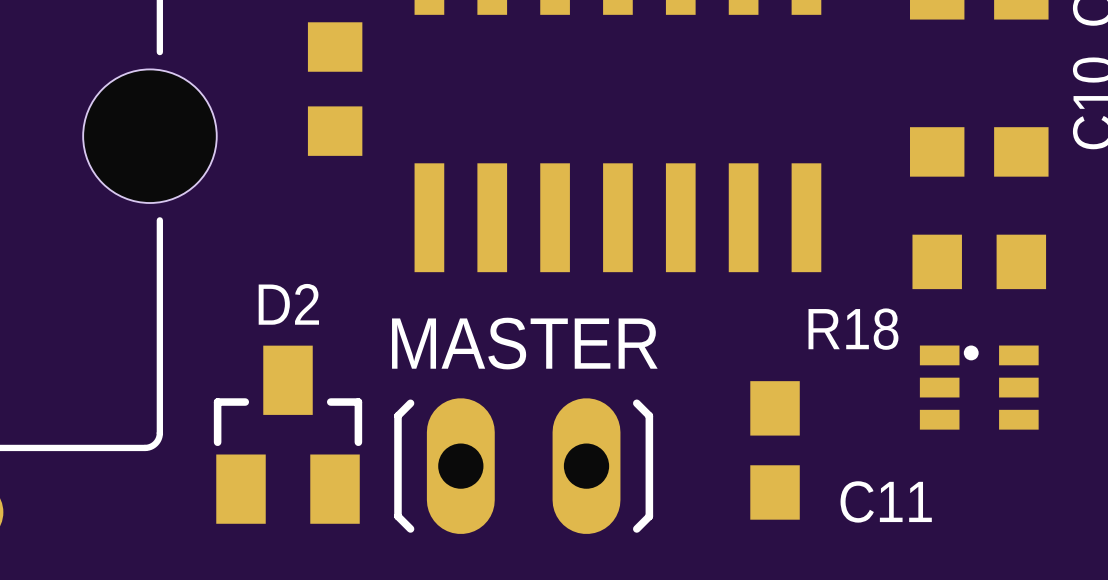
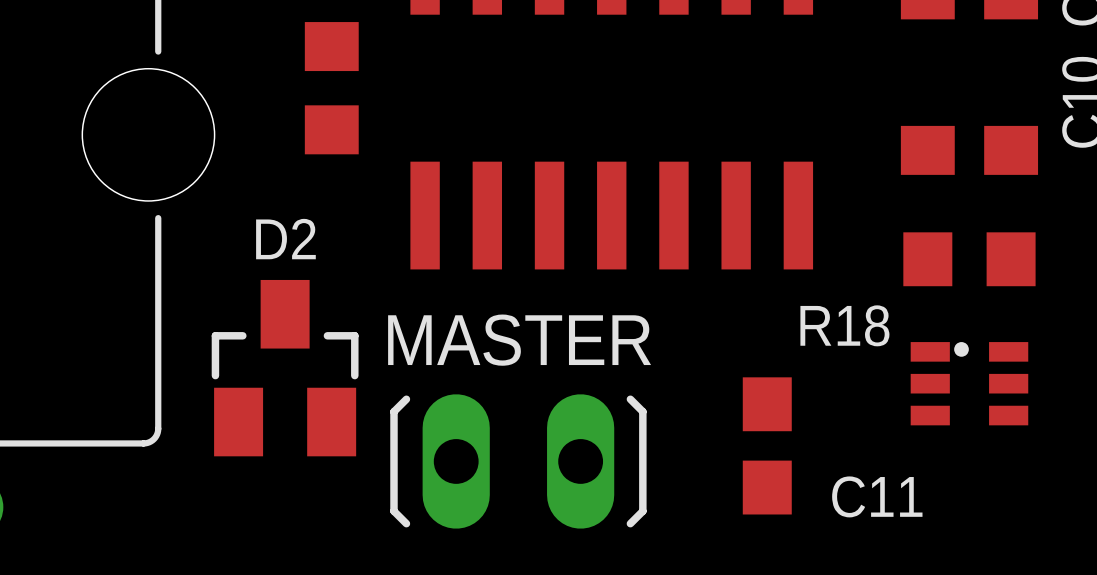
D2 position: (288, 434) -> (285, 368)

